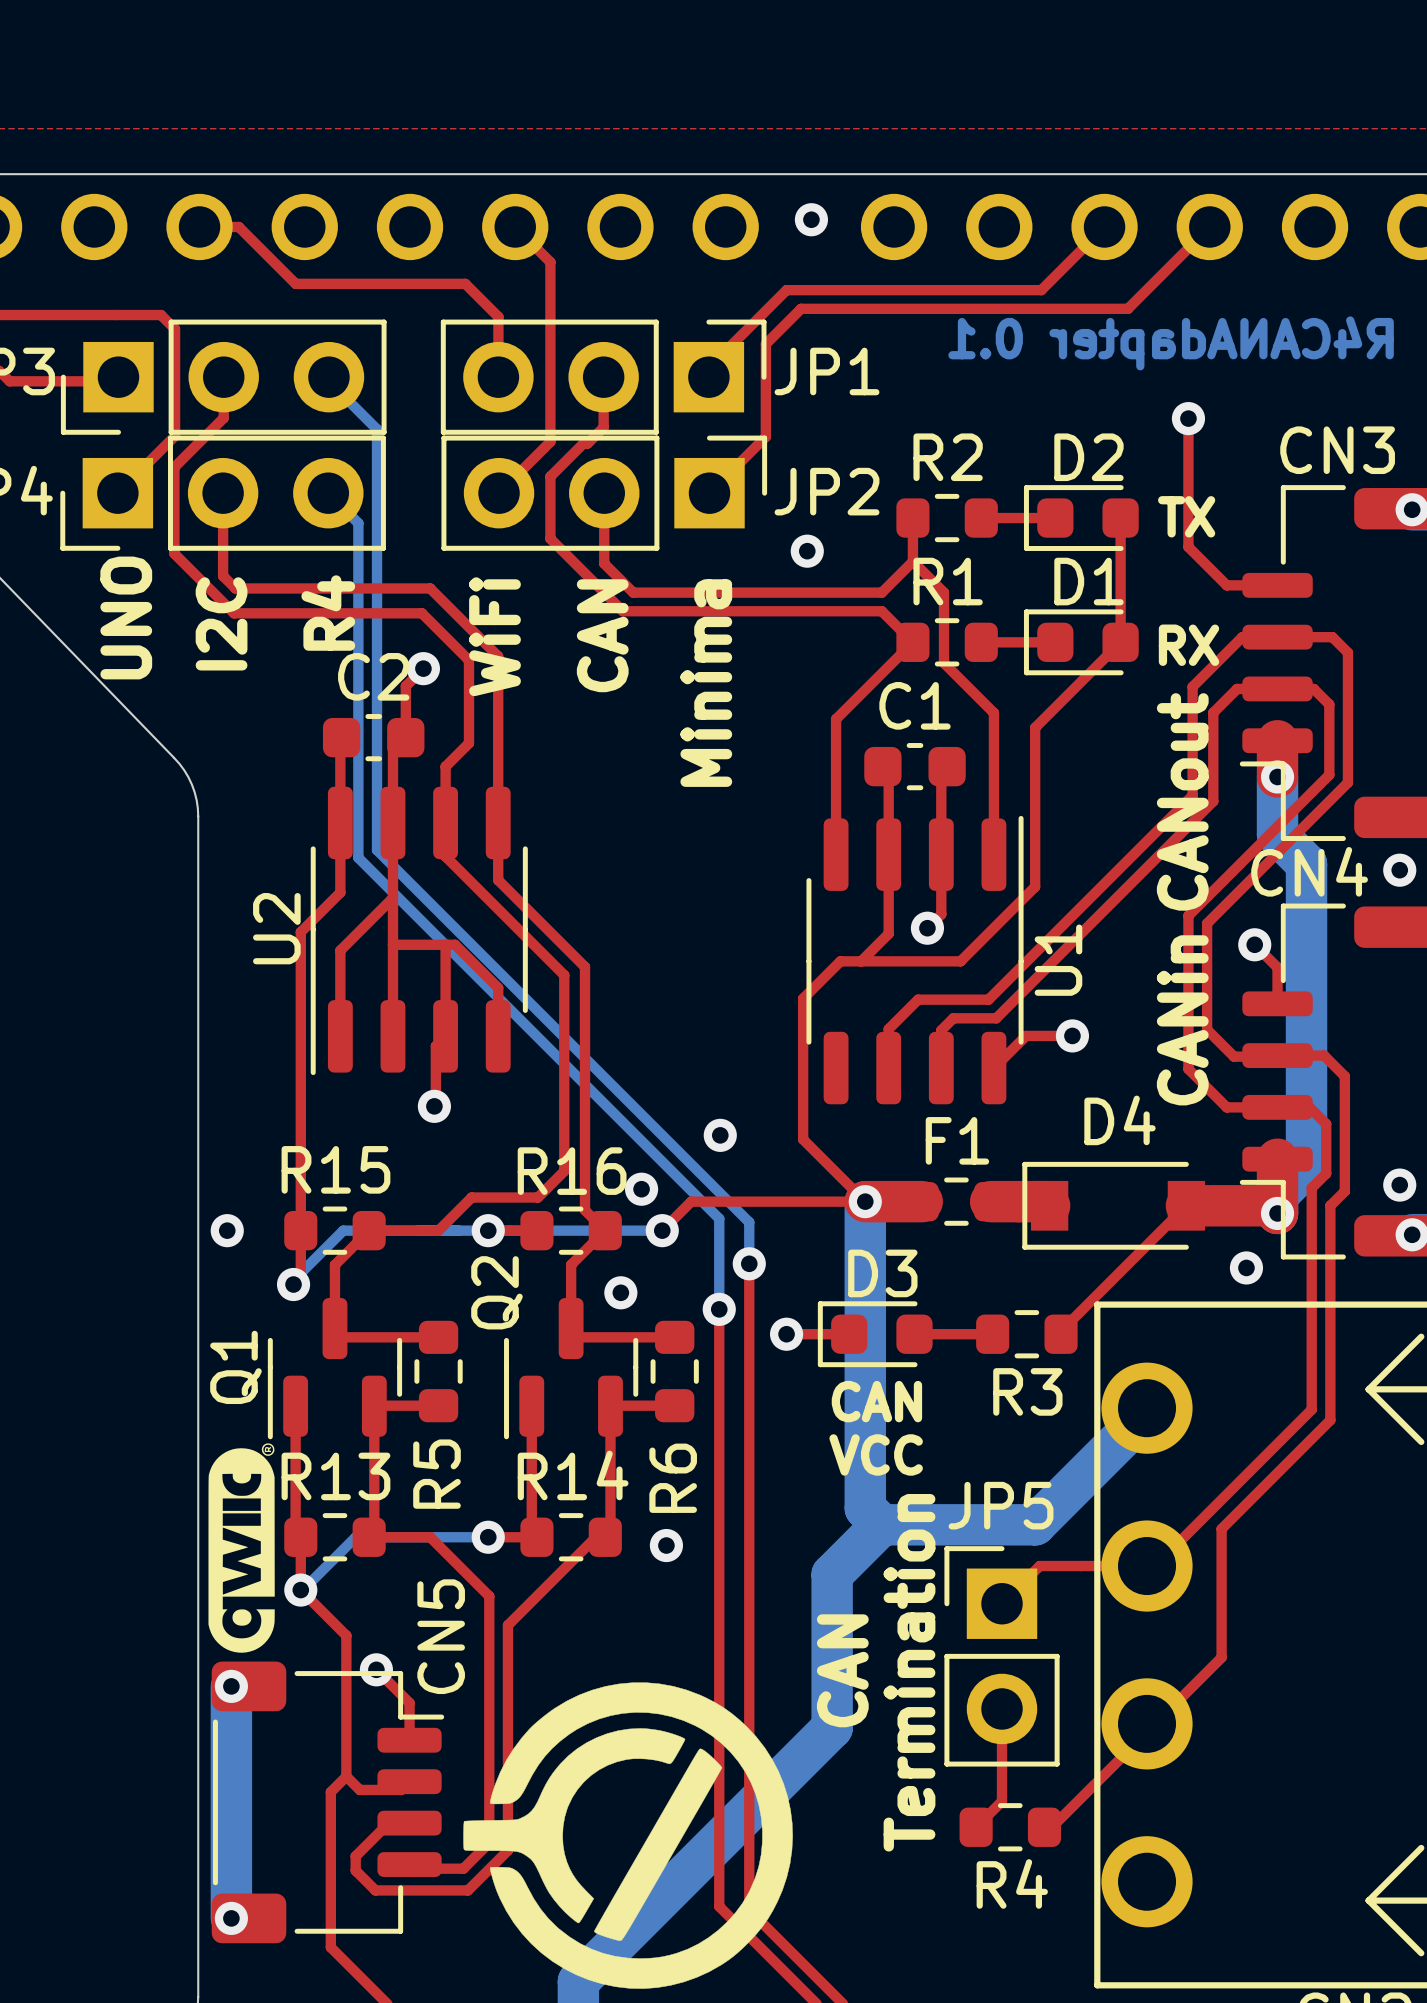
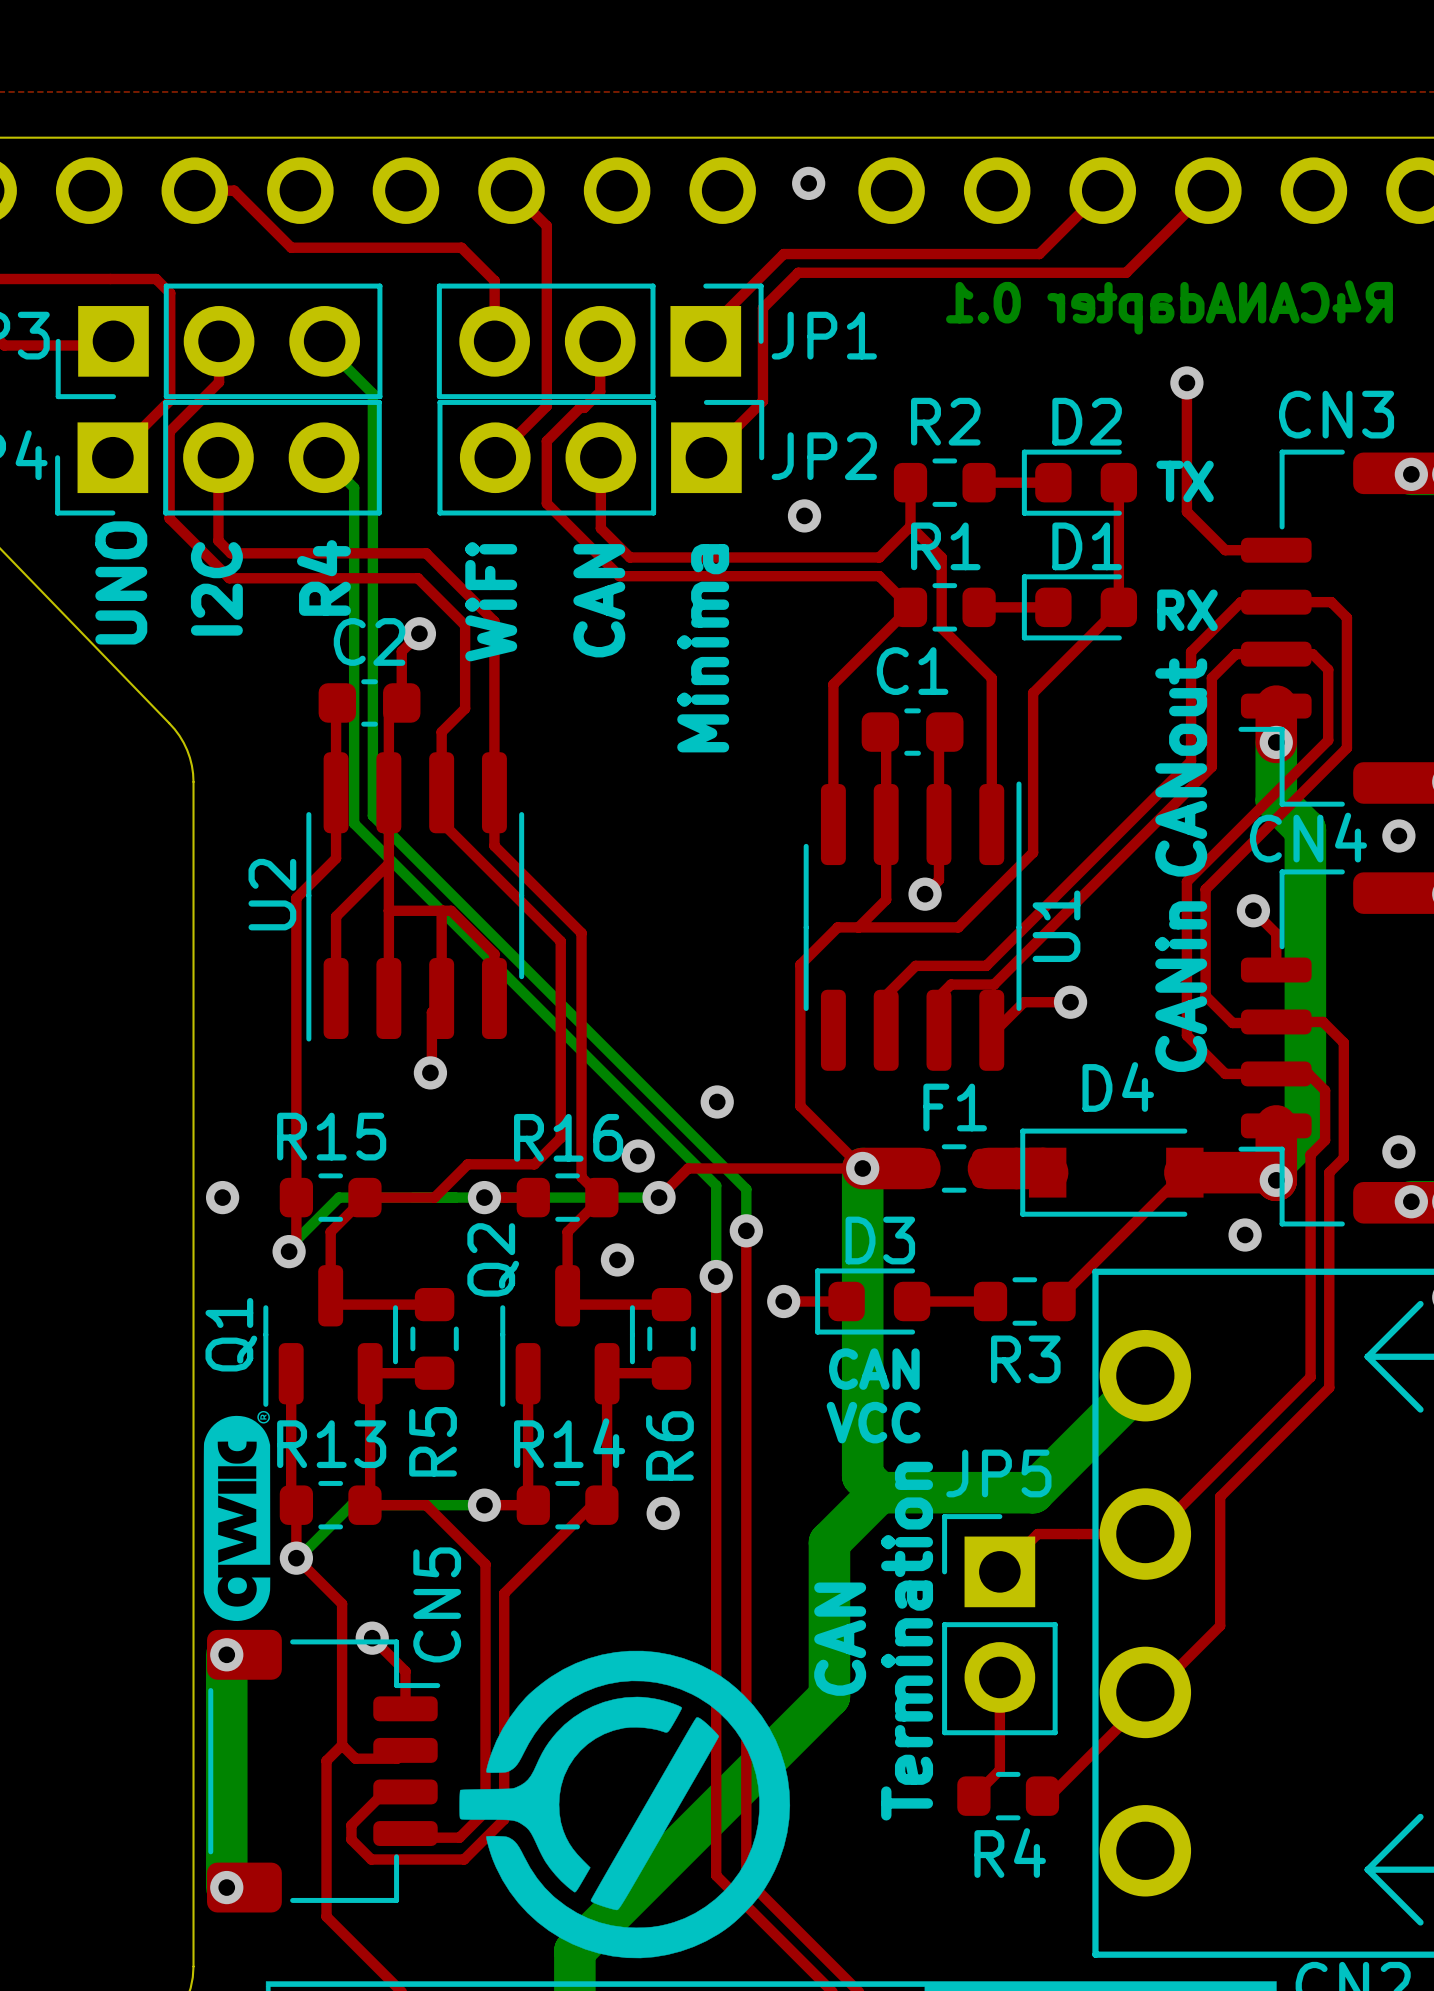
U2 footprint: [310, 786, 528, 1076] -> [306, 752, 525, 1042]
U1 footprint: [806, 815, 1024, 1105] -> [803, 781, 1022, 1071]

